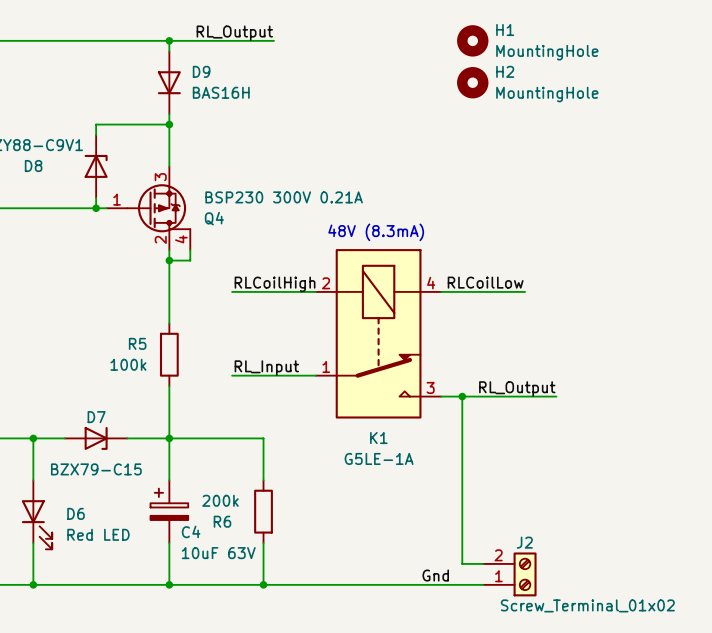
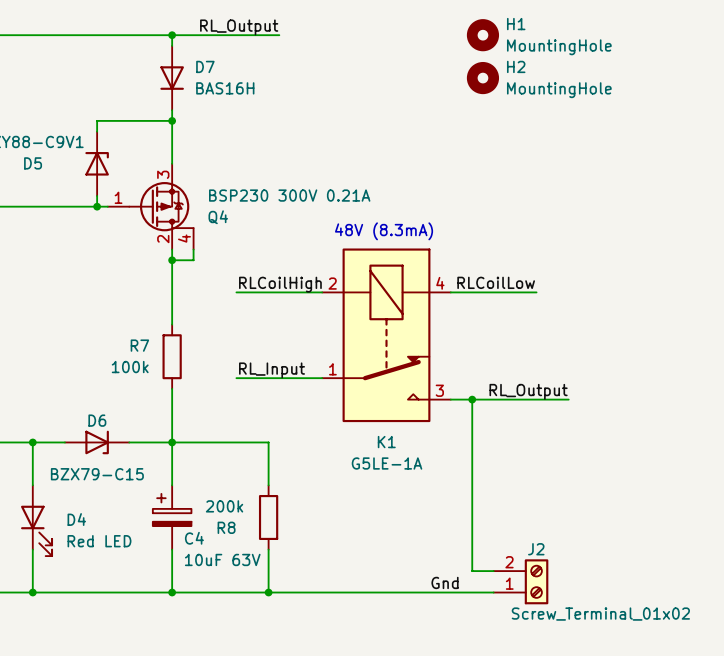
D9 name: D9 (201, 71) -> D7 (205, 66)
D8 name: D8 (33, 166) -> D5 (33, 163)
R5 name: R5 (137, 343) -> R7 (139, 345)
D7 name: D7 (96, 417) -> D6 (97, 420)
D6 name: D6 (76, 513) -> D4 (76, 519)
R6 name: R6 (222, 521) -> R8 (226, 527)

